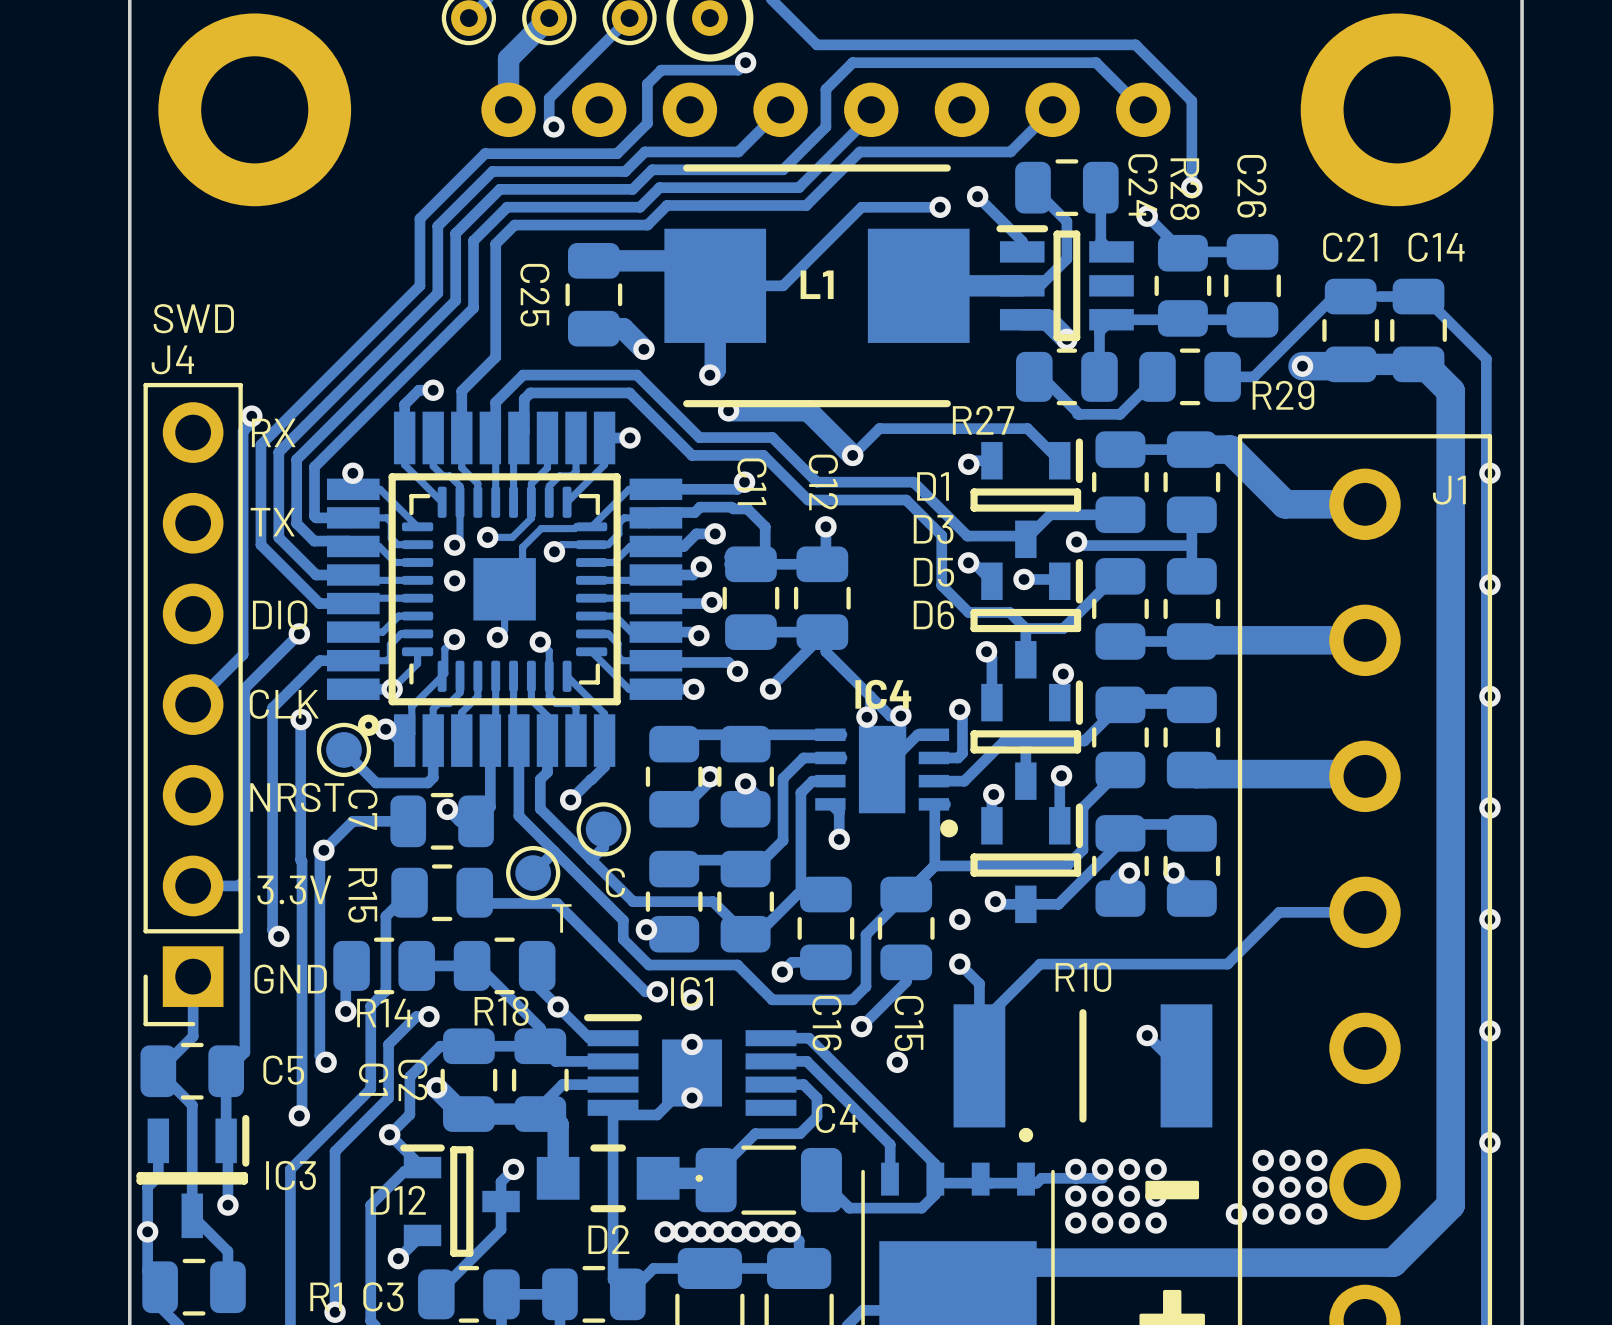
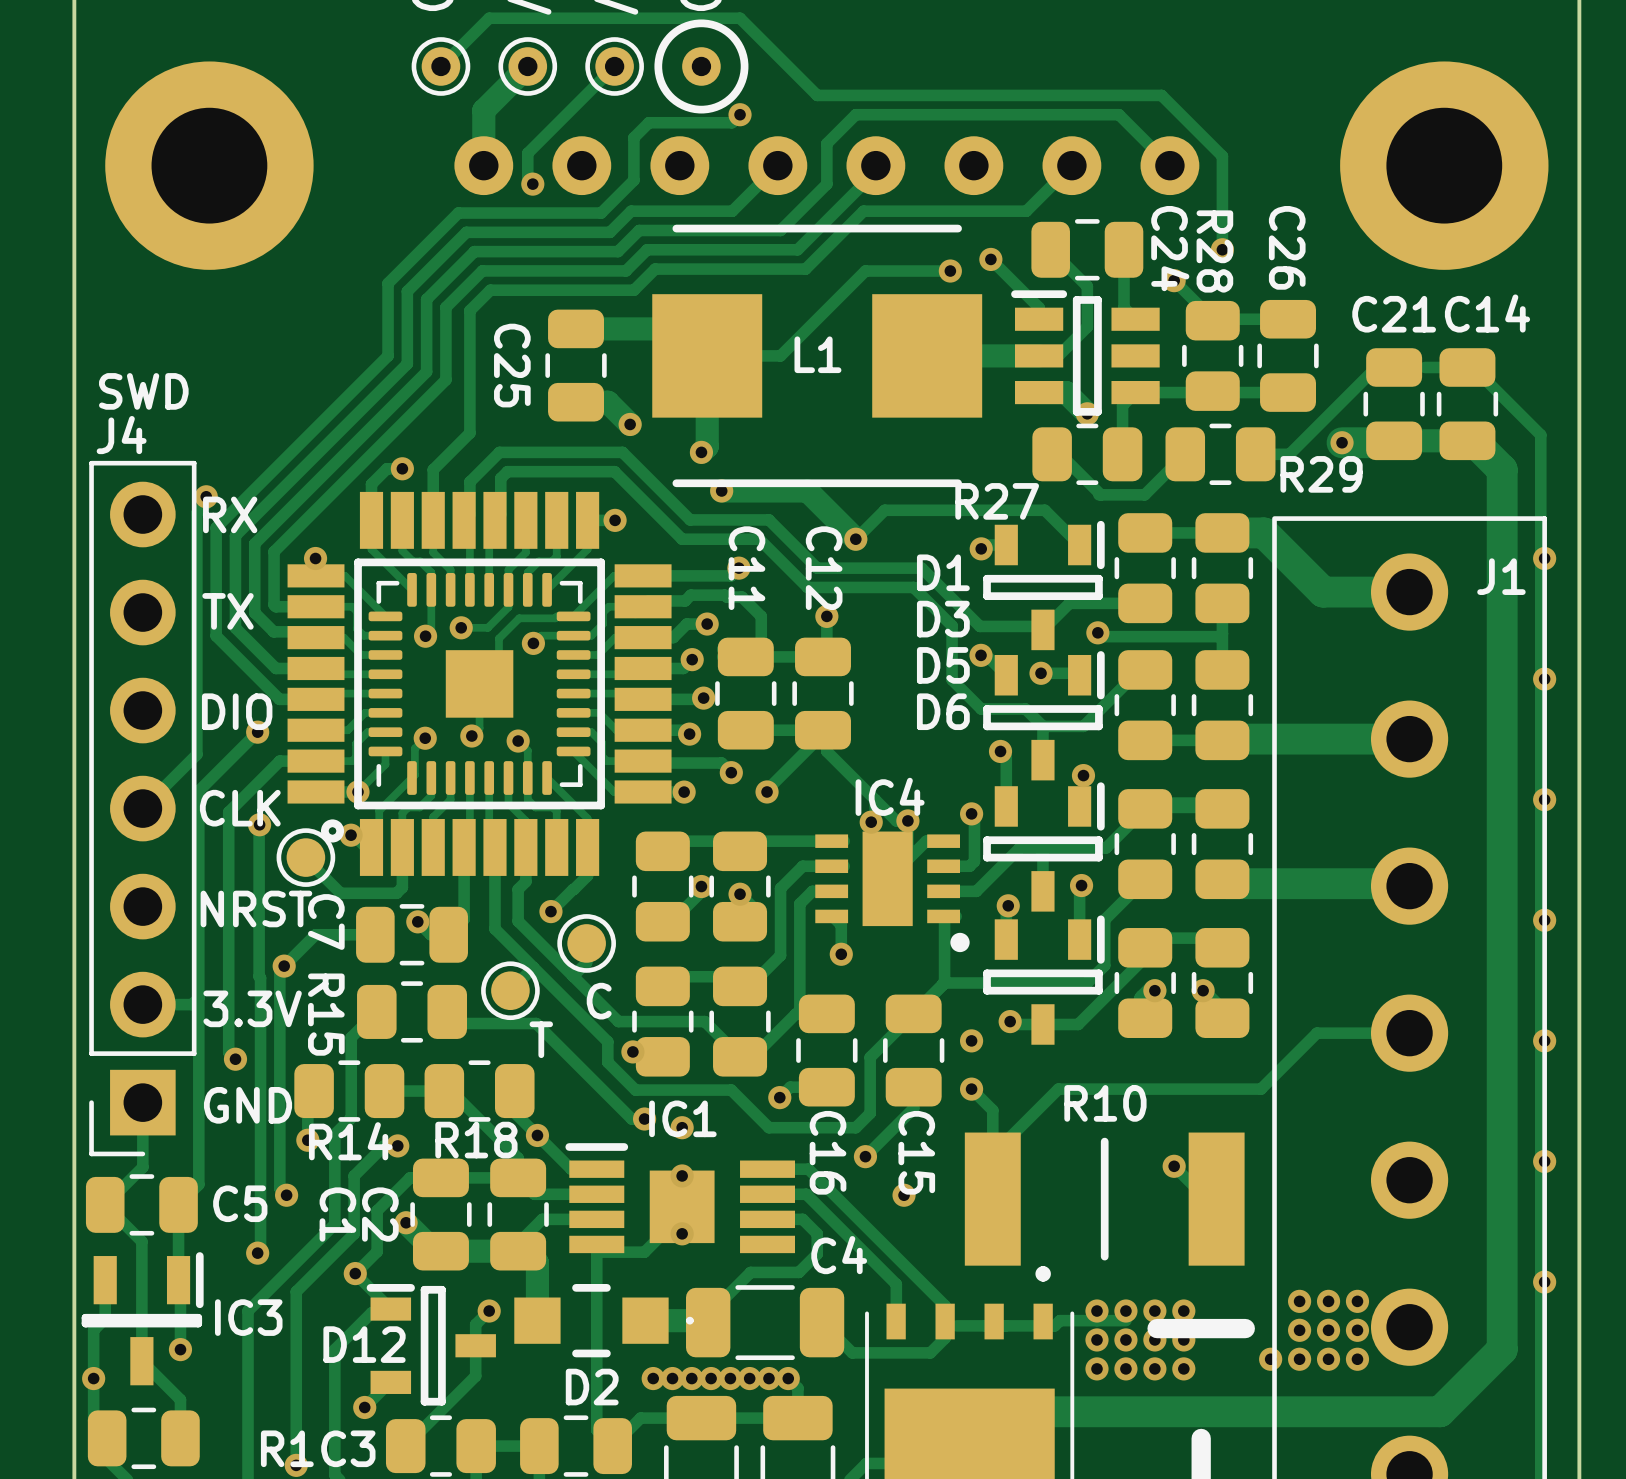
via: (454, 580) -> none

